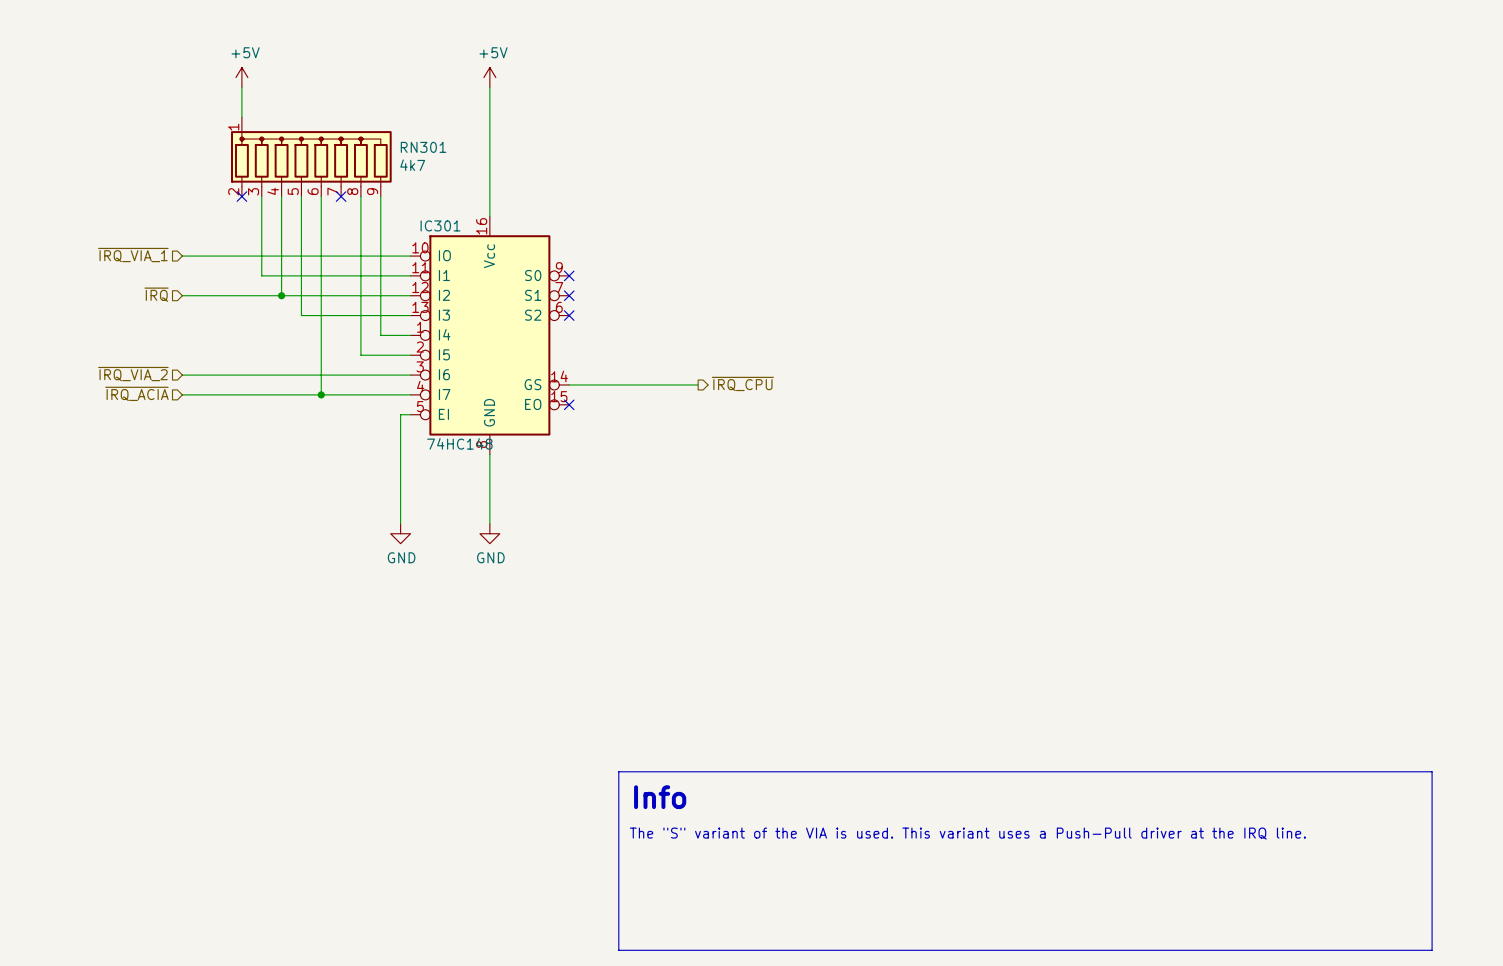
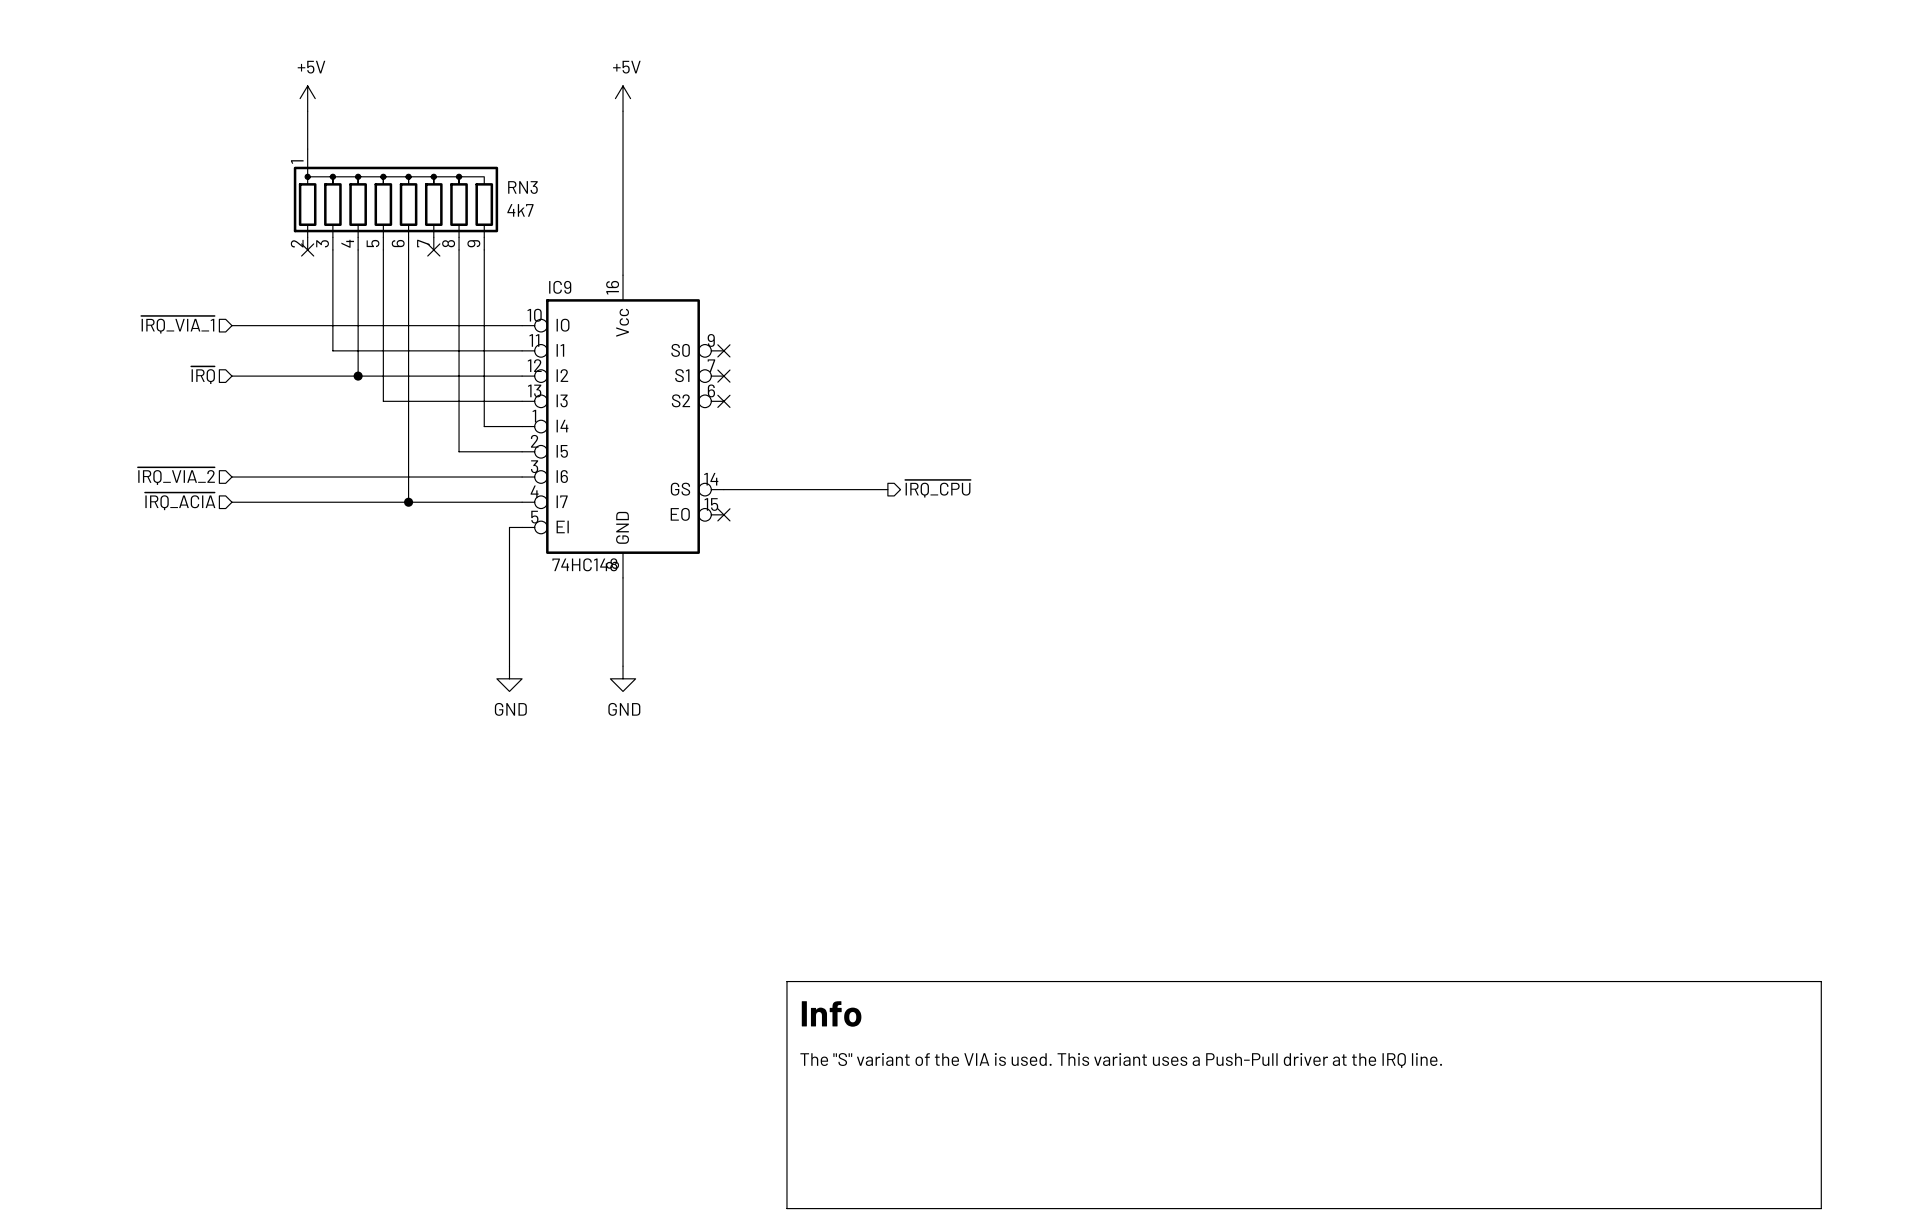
RN301 name: RN301 (423, 147) -> RN3 (522, 187)
IC301 name: IC301 (440, 225) -> IC9 (560, 287)

